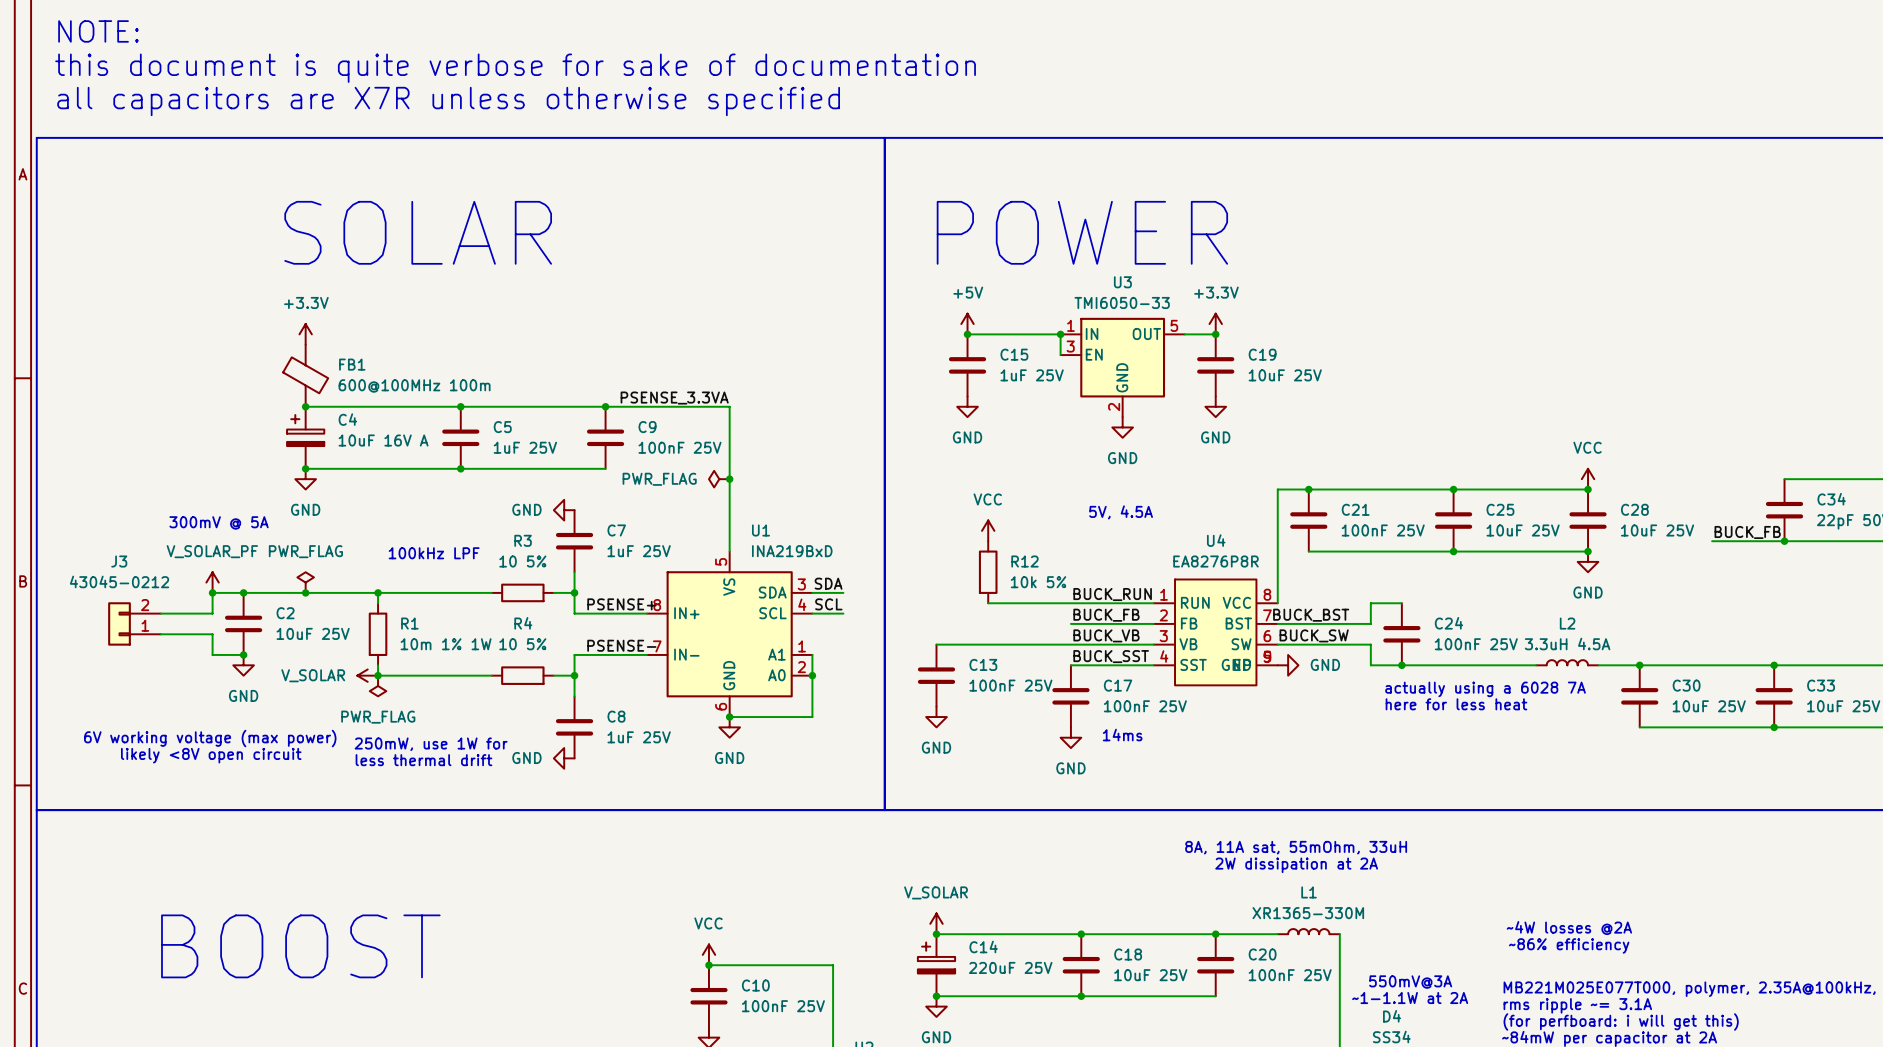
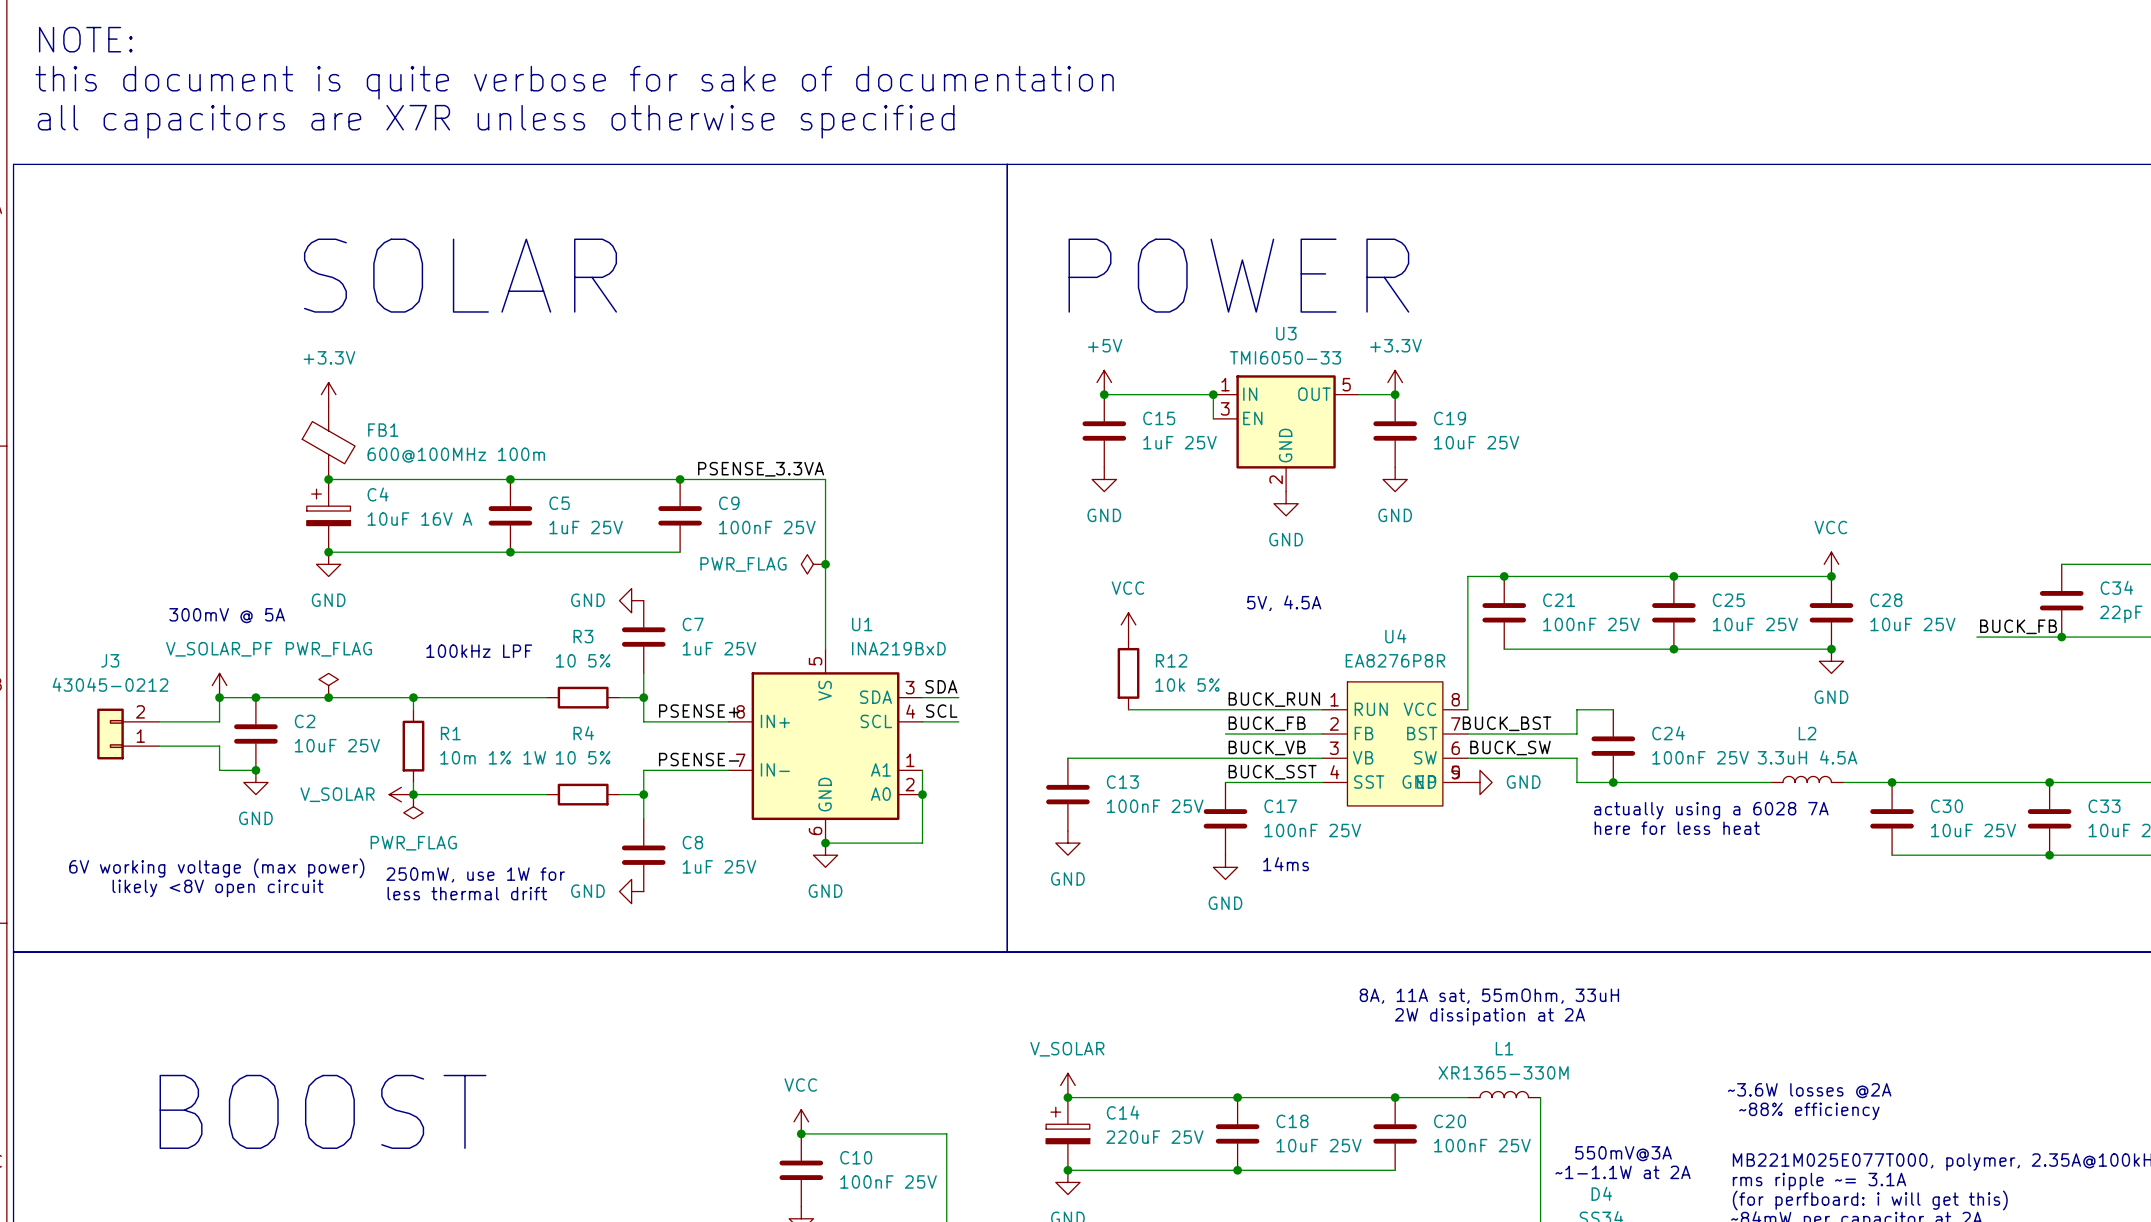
text: ~4W losses @2A (1569, 928) -> ~3.6W losses @2A (1809, 1090)
text: ~86% efficiency (1569, 945) -> ~88% efficiency (1809, 1111)

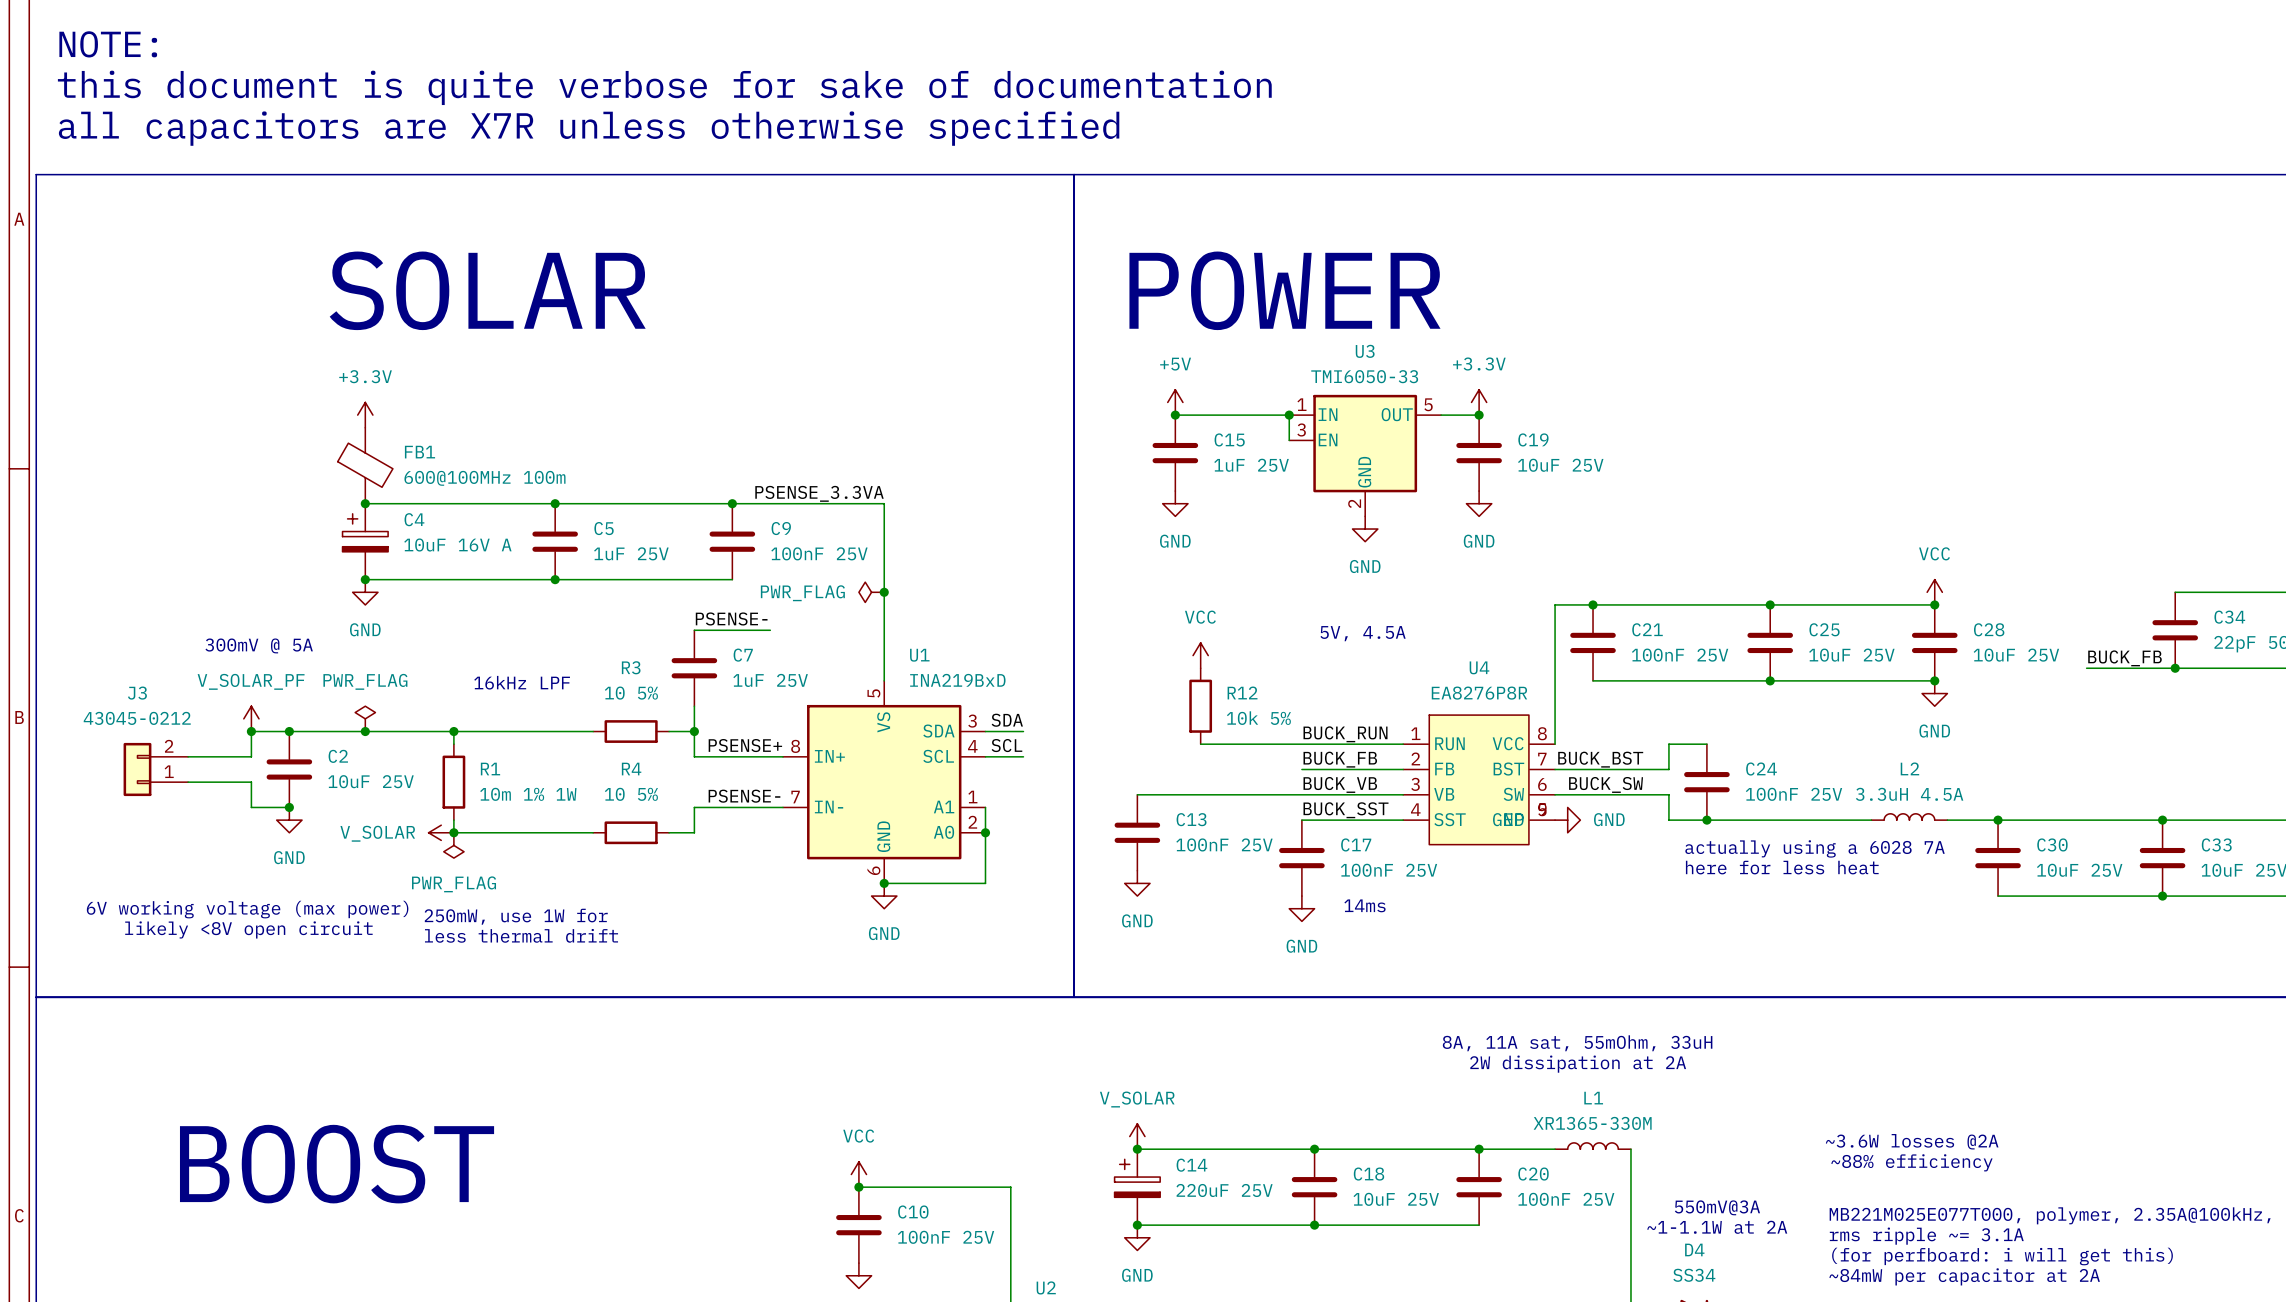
label: none -> PSENSE- (731, 618)
power symbol: GND (631, 600) -> none
wire: none -> (694, 630) (770, 630)
text: 100kHz LPF (479, 651) -> 16kHz LPF (522, 682)
wire: (643, 794) (643, 818) -> none
junction: (643, 794) -> none
C8: 1uF 25V (643, 855) -> none
power symbol: GND (631, 891) -> none

